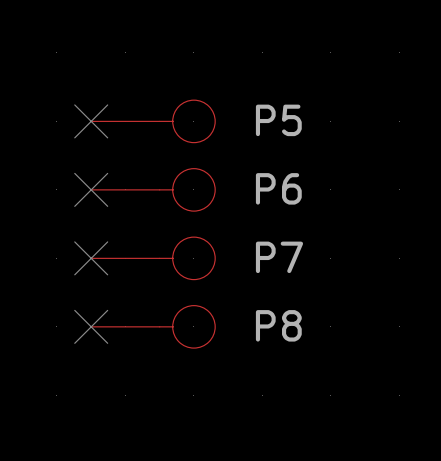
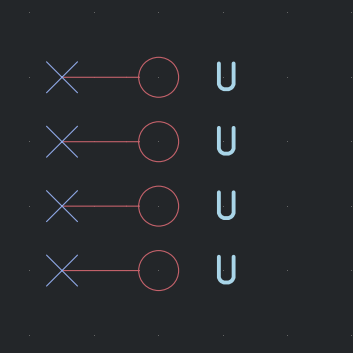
P5 name: P5 (278, 120) -> U (226, 76)
P6 name: P6 (278, 188) -> U (226, 140)
P7 name: P7 (279, 257) -> U (226, 205)
P8 name: P8 (278, 325) -> U (226, 269)

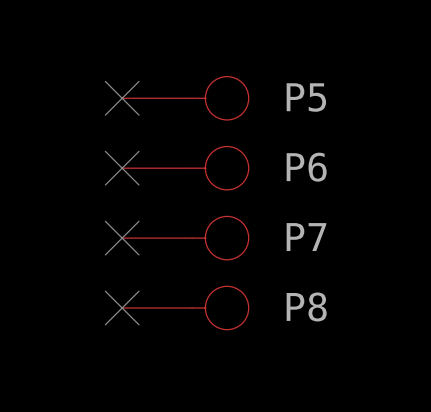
U name: U (226, 76) -> P5 (306, 97)
U name: U (226, 140) -> P6 (306, 167)
U name: U (226, 205) -> P7 (306, 237)
U name: U (226, 269) -> P8 (306, 306)

